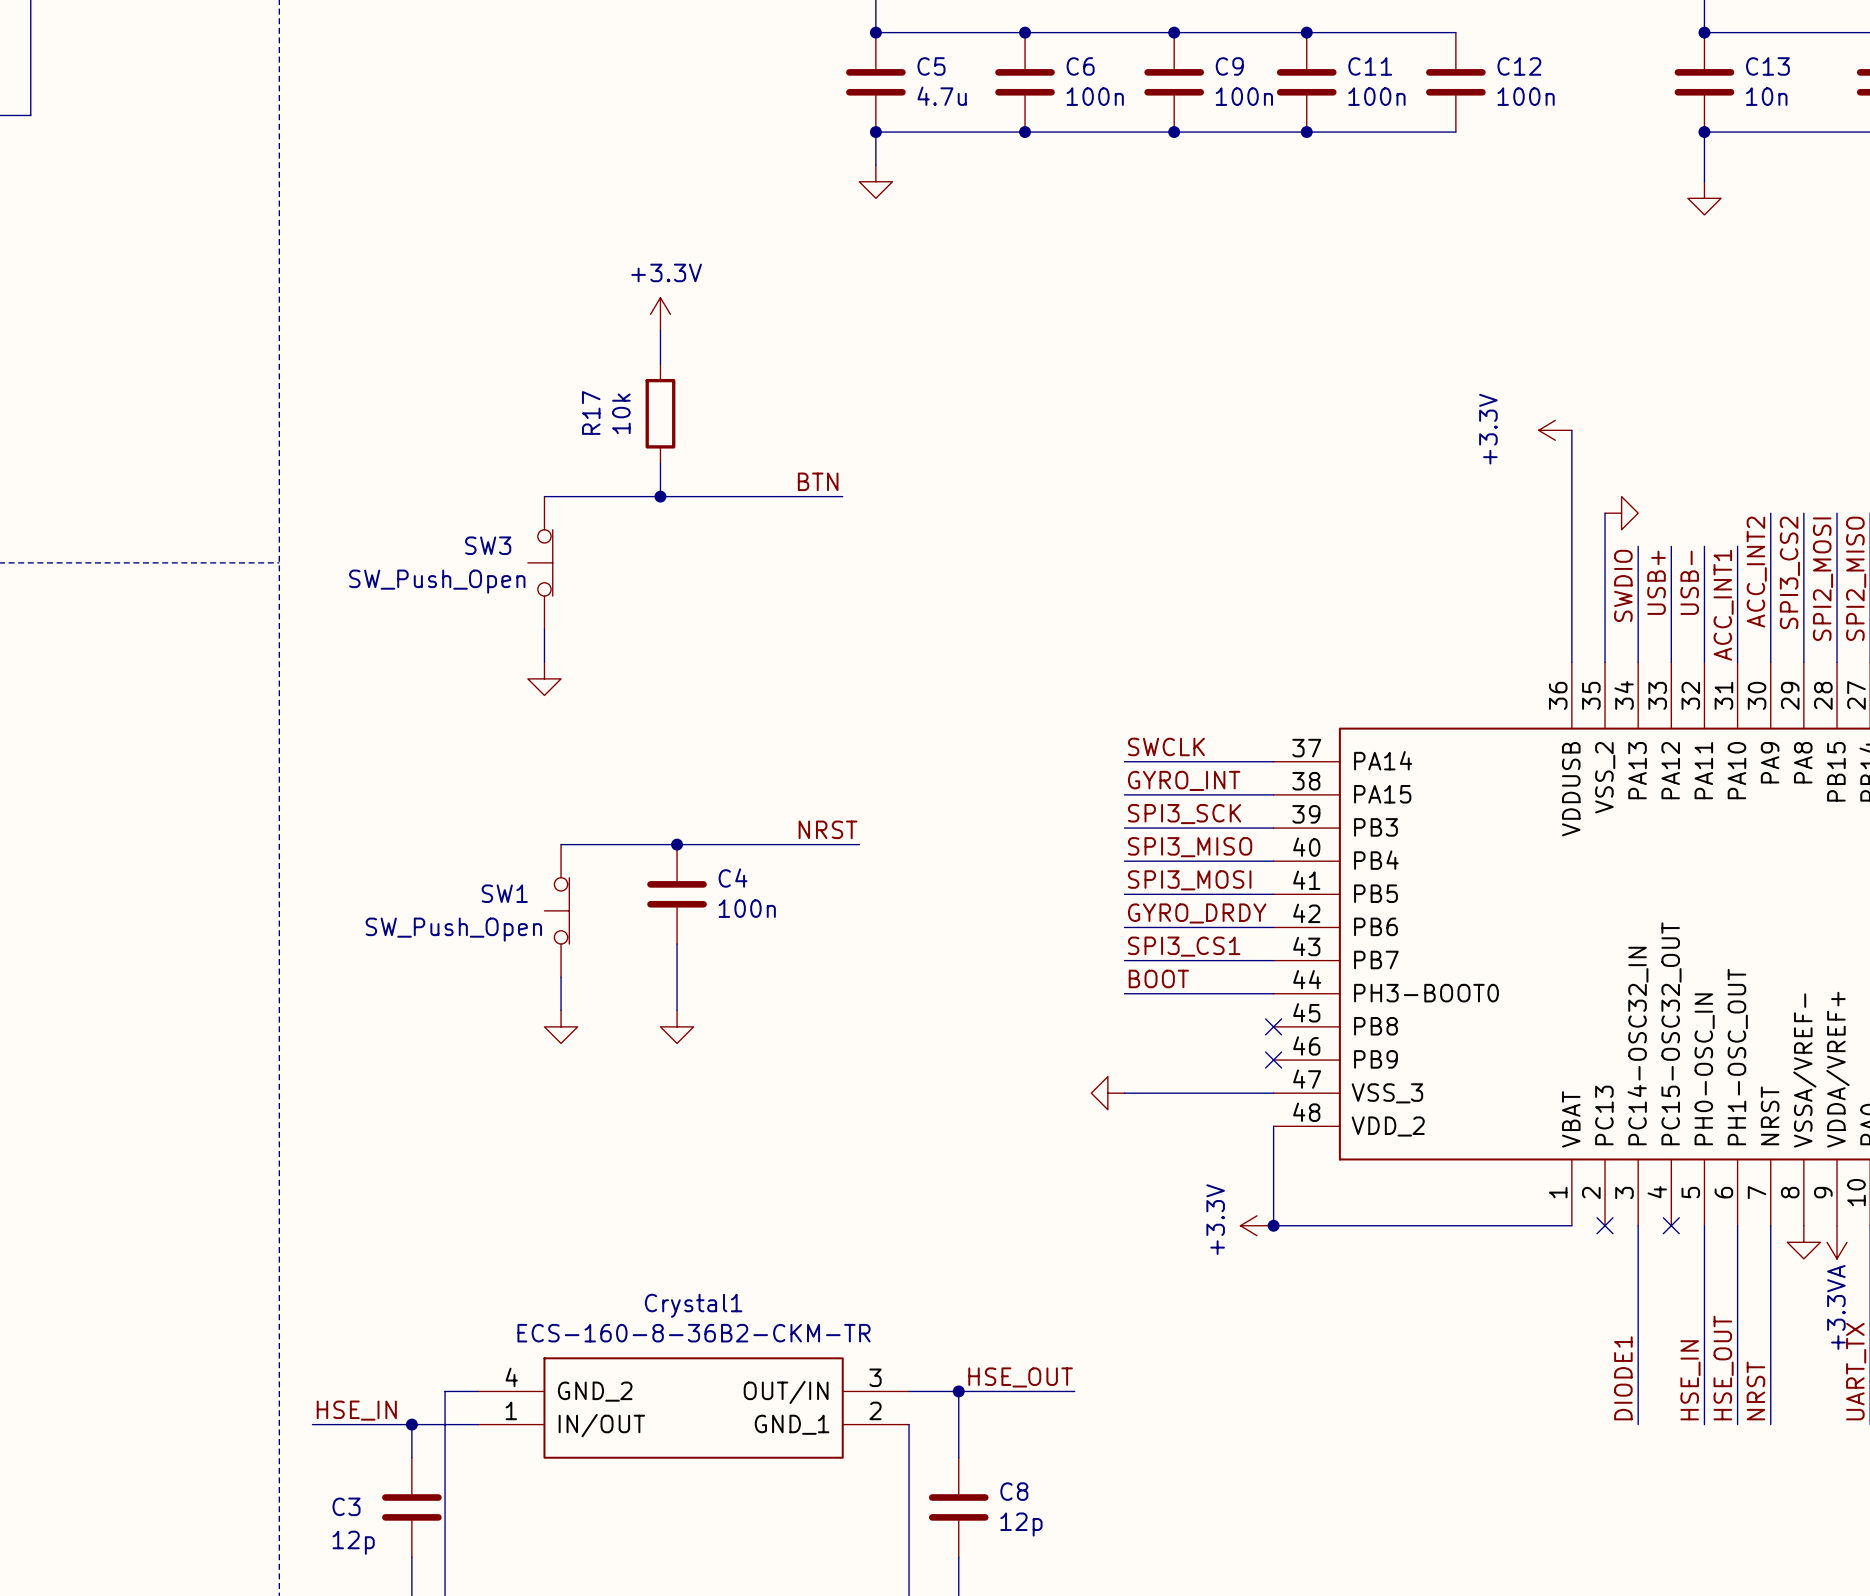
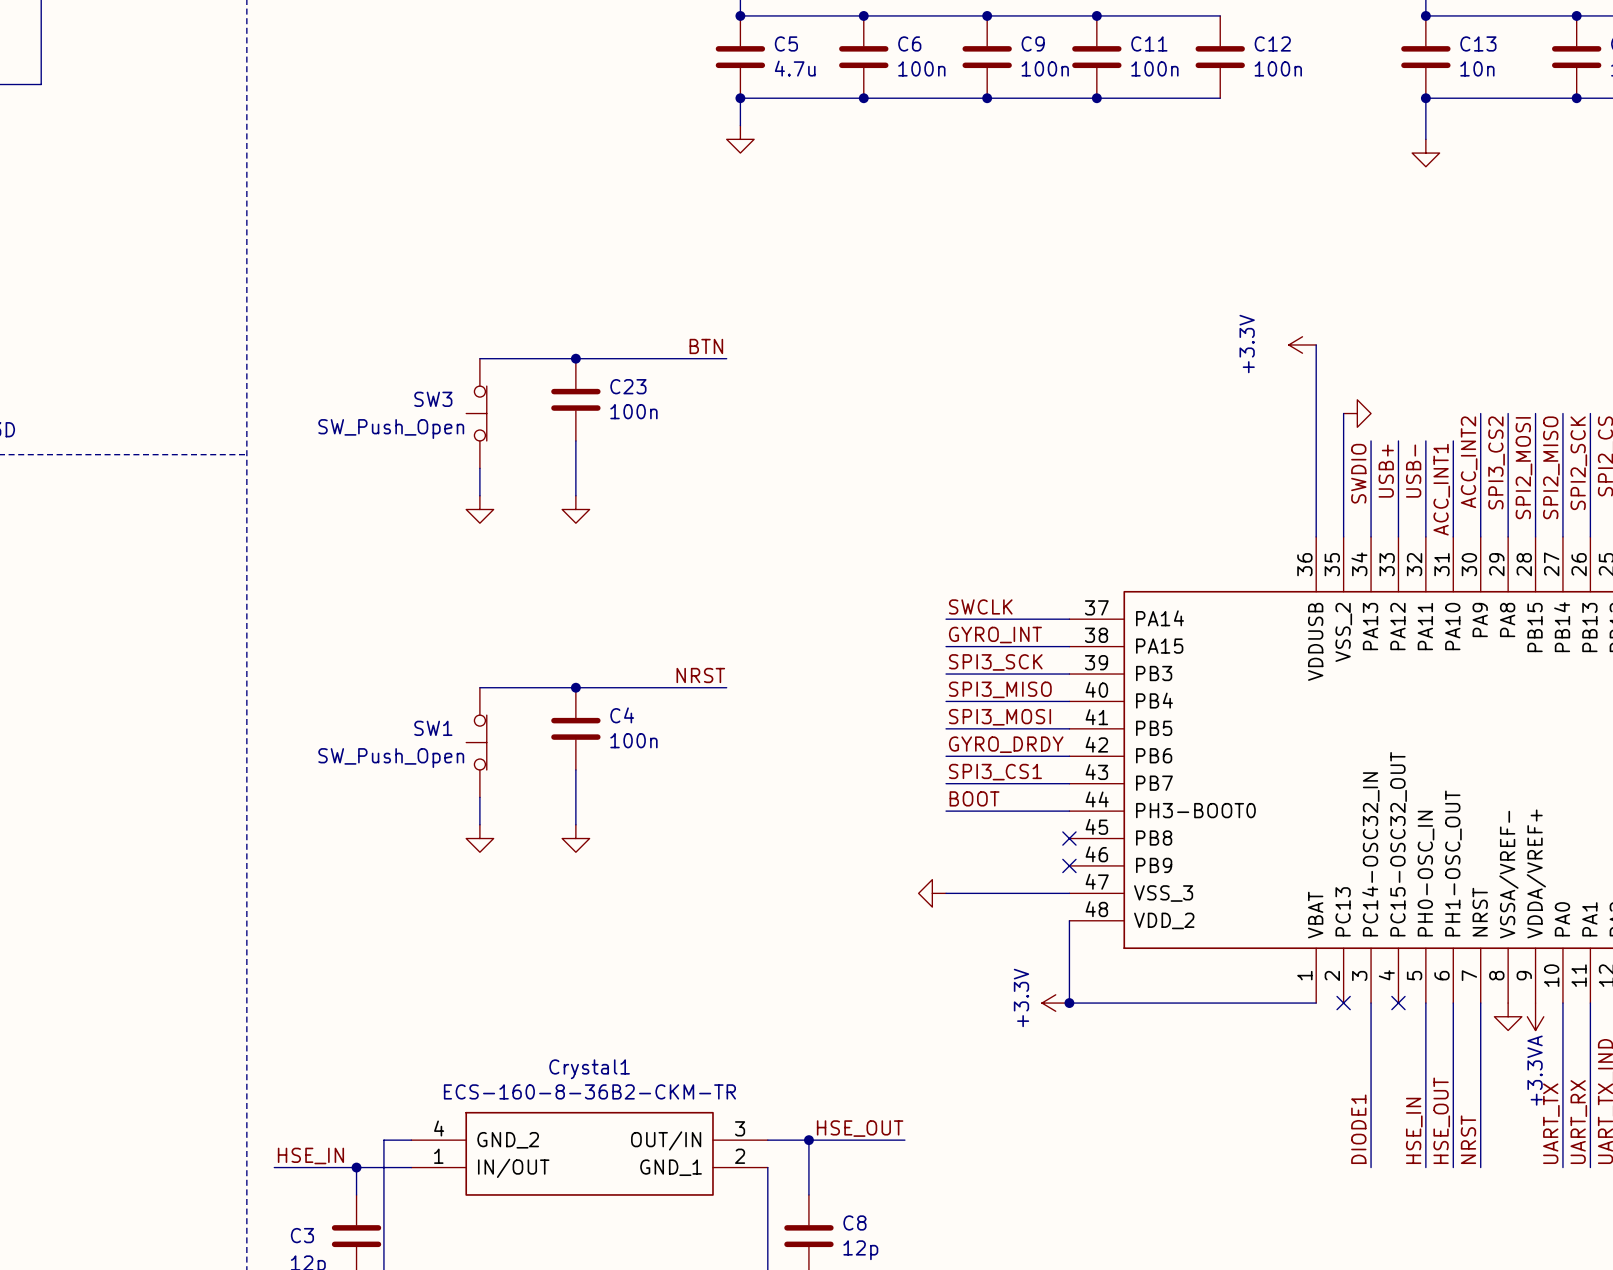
power symbol: +3.3V (660, 314) -> none
wire: (660, 330) (660, 364) -> none
R17: 10k (660, 413) -> none
wire: (660, 463) (660, 496) -> none
label position: BTN (818, 481) -> BTN (706, 346)
wire: (544, 496) (842, 496) -> (479, 358) (726, 358)
junction position: (660, 496) -> (575, 358)
C23: none -> 100n (575, 399)
wire: none -> (575, 440) (575, 495)
SW3 position: (540, 562) -> (476, 413)
wire: (544, 629) (544, 662) -> (479, 468) (479, 495)
power symbol: none -> (575, 509)
power symbol position: (544, 678) -> (479, 509)

